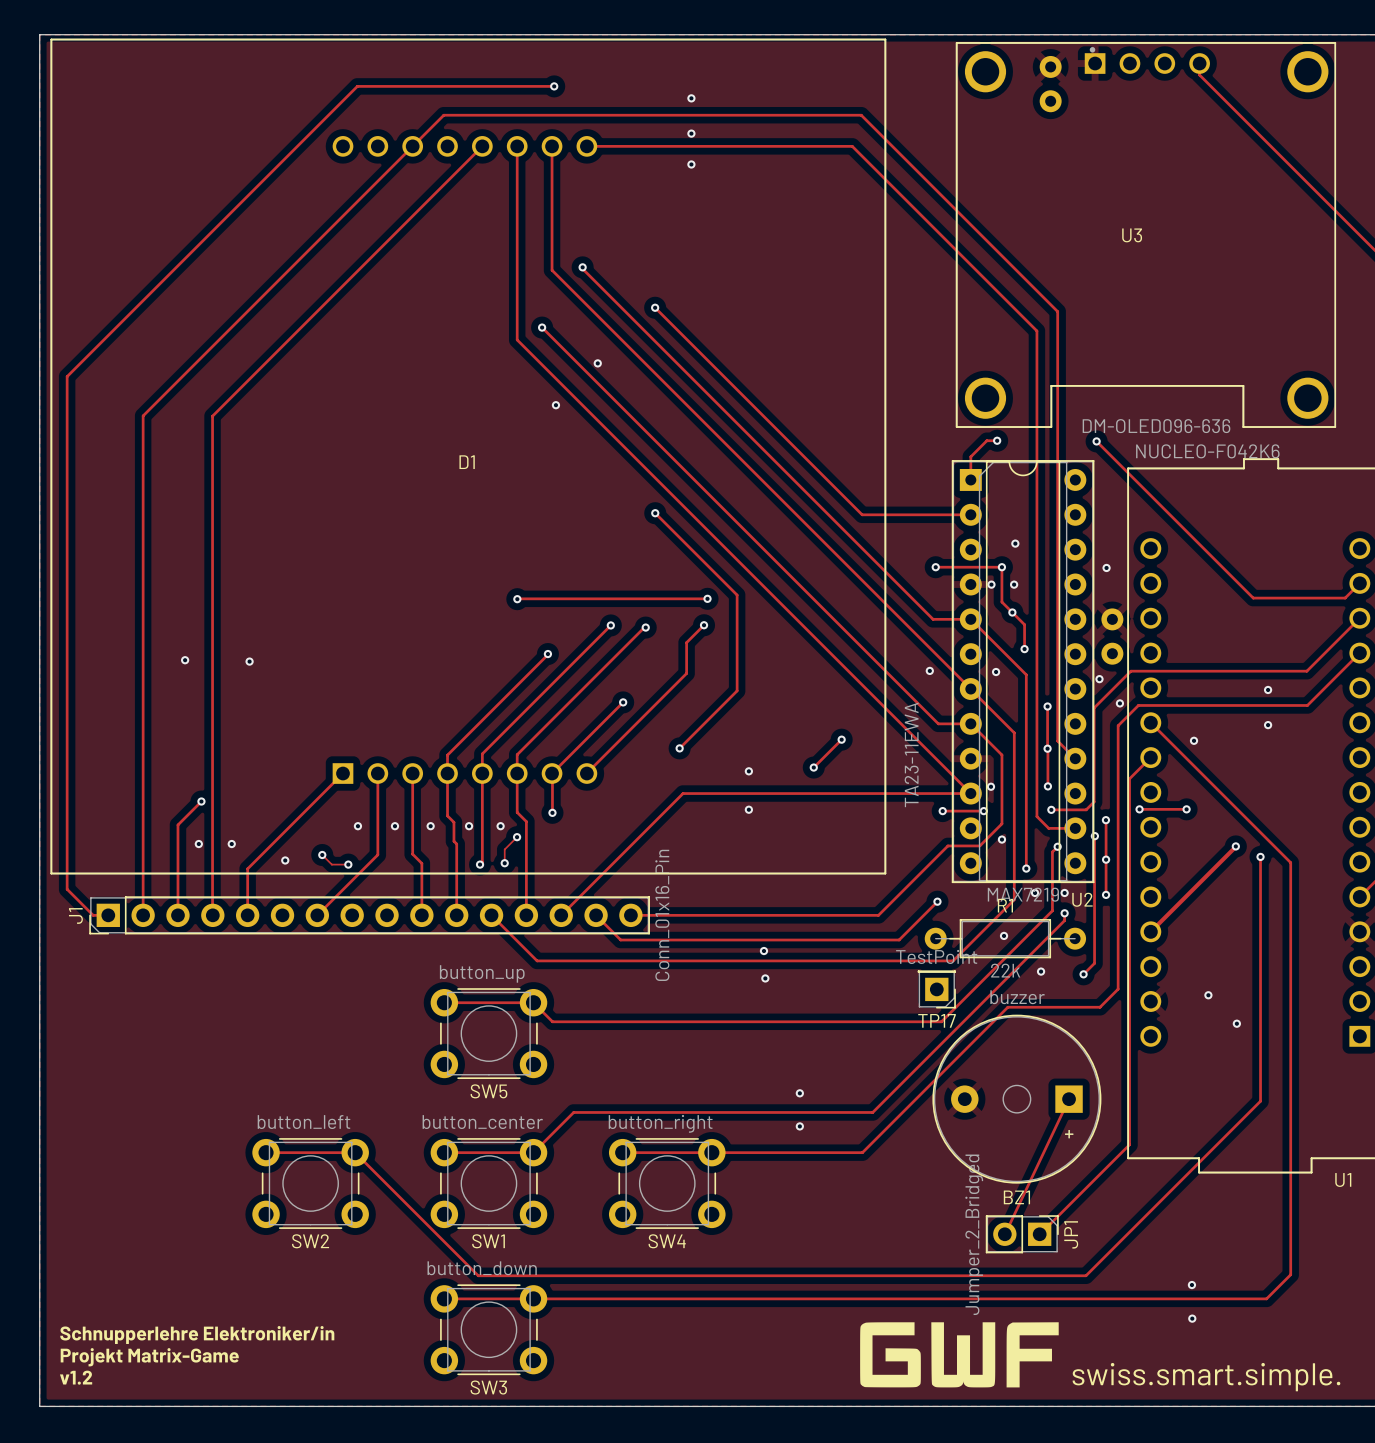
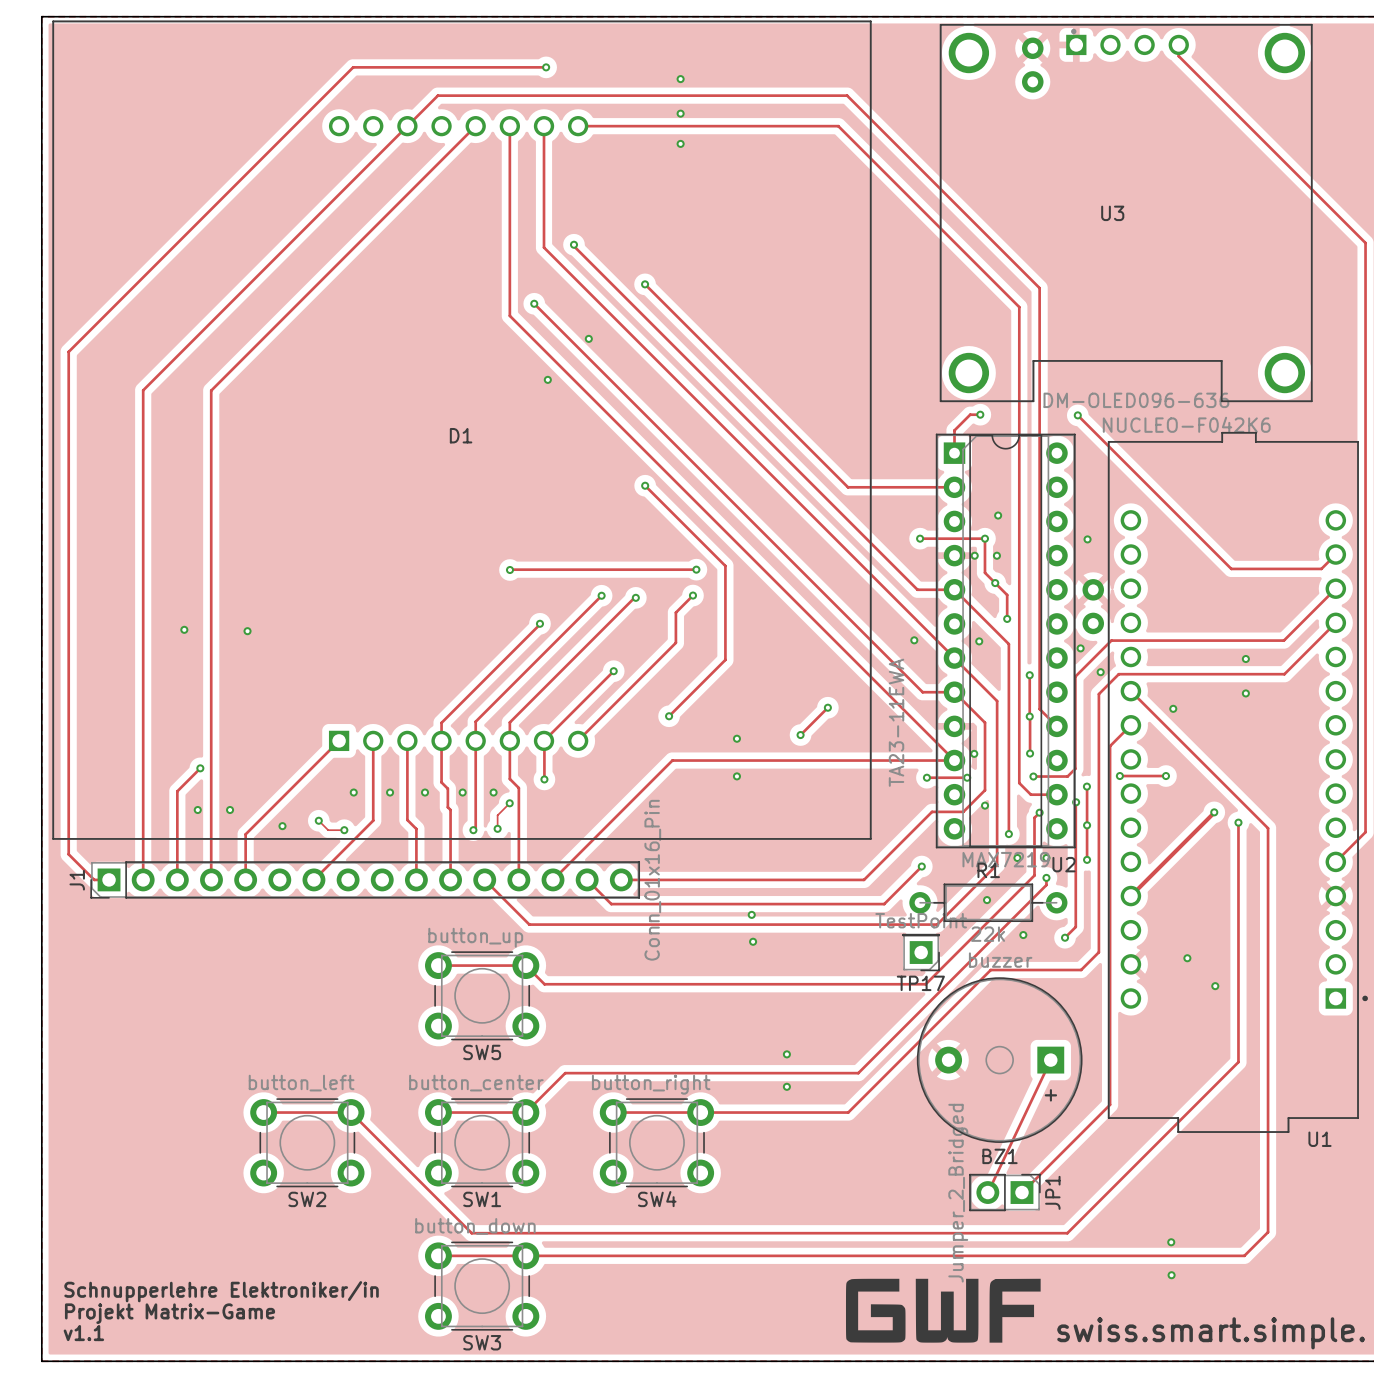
text: v1.2 (76, 1377) -> v1.1 (83, 1333)

